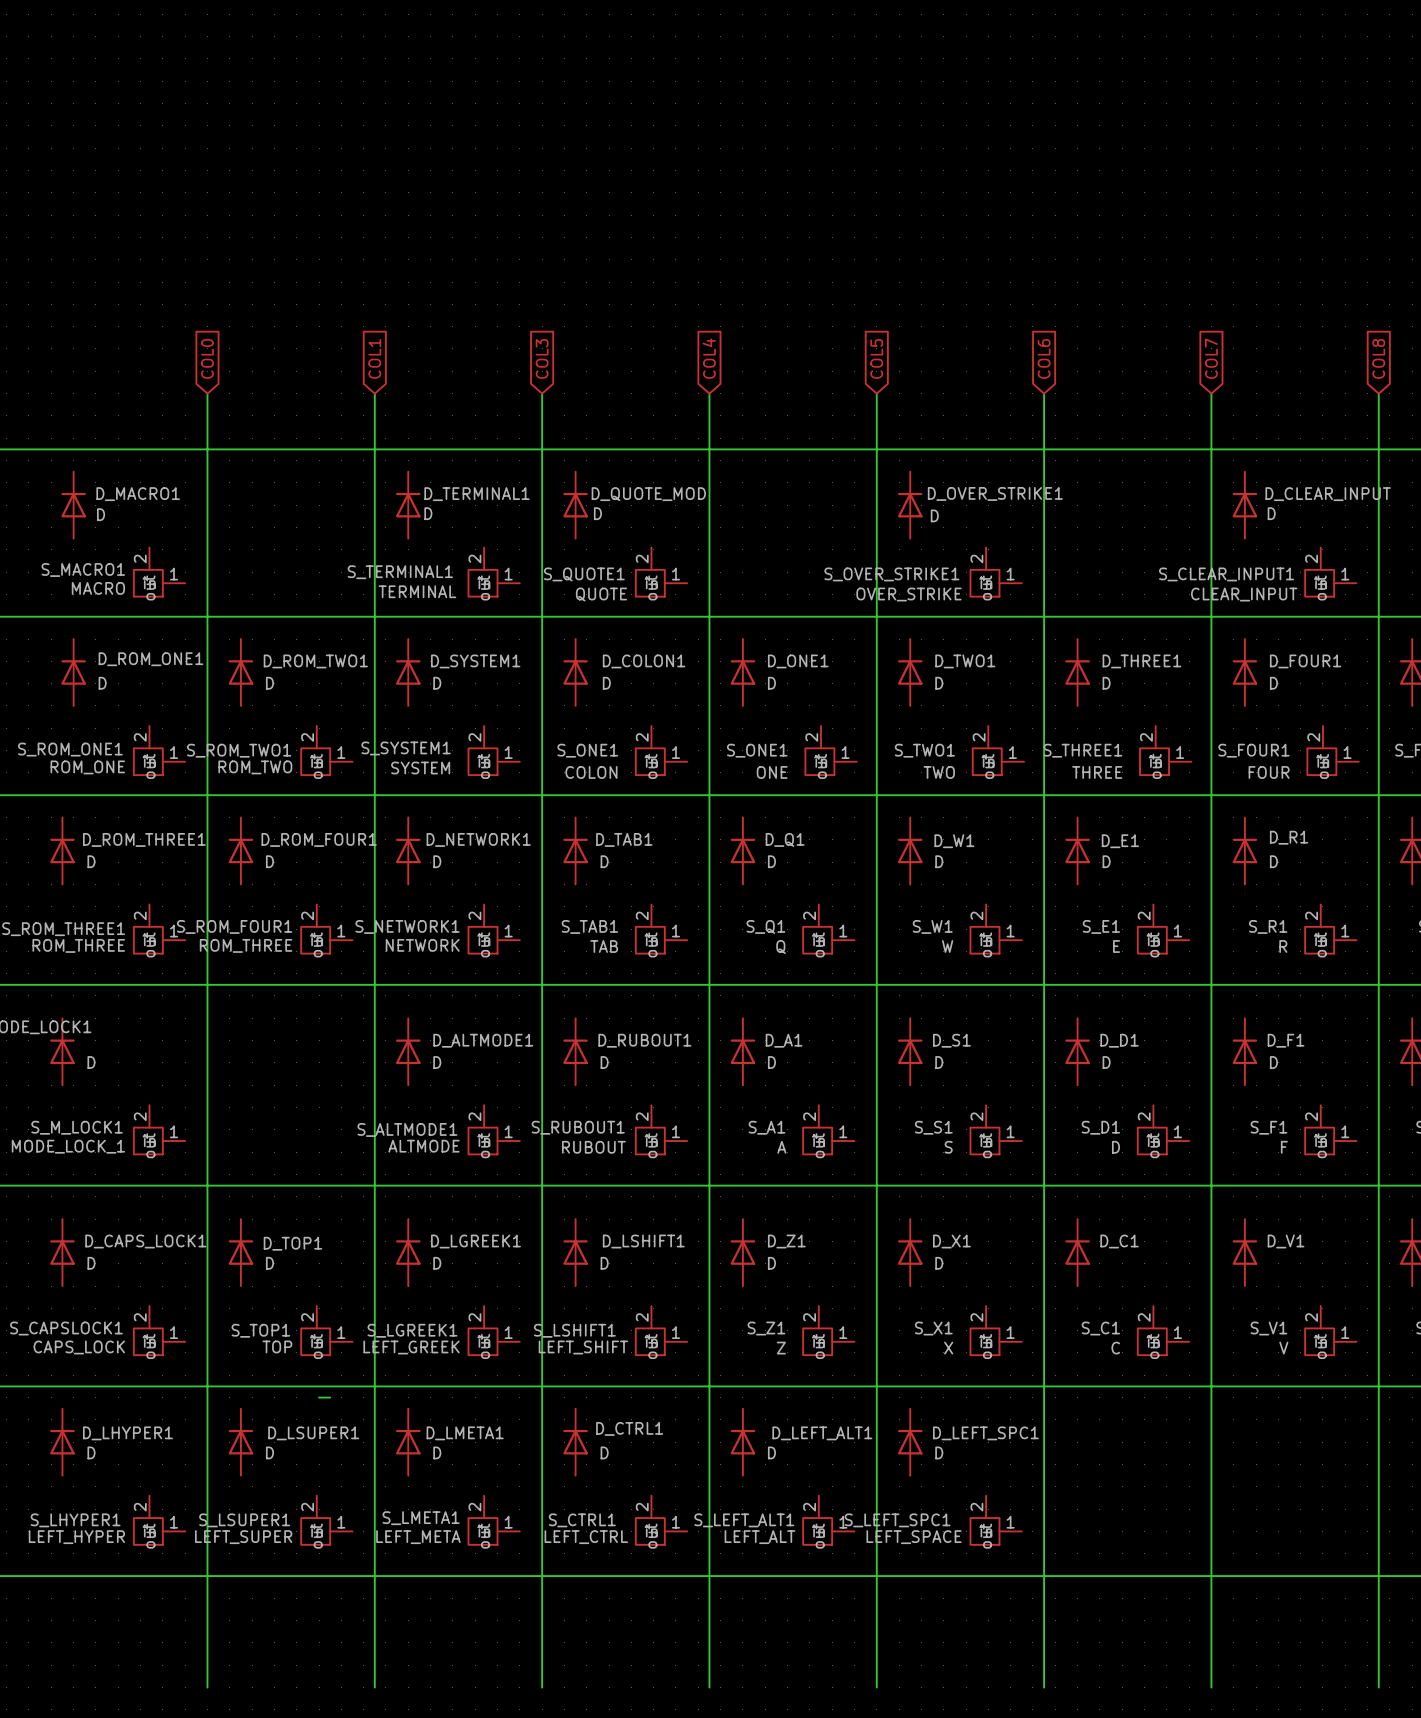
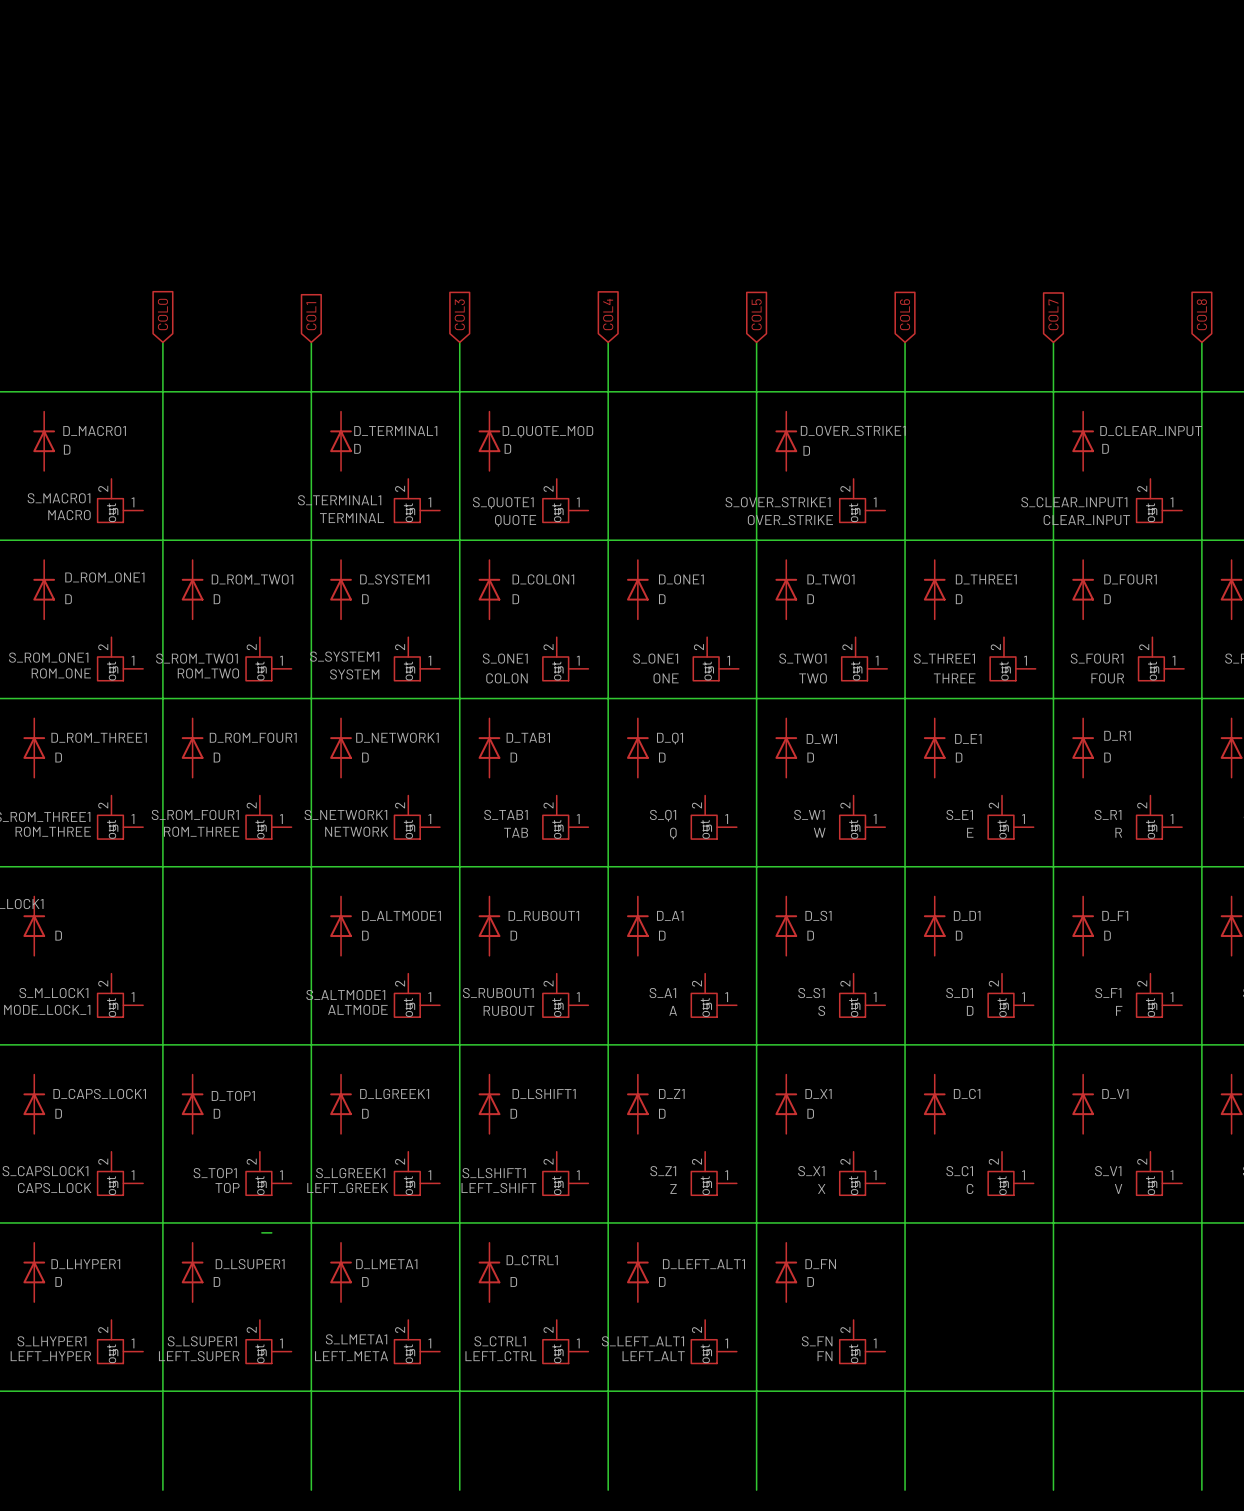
D_LEFT_SPC1 name: D_LEFT_SPC1 (985, 1433) -> D_FN (820, 1264)
S_LEFT_SPC1 name: S_LEFT_SPC1 (897, 1520) -> S_FN (817, 1341)
S_LEFT_SPC1 value: LEFT_SPACE (914, 1537) -> FN (825, 1356)

